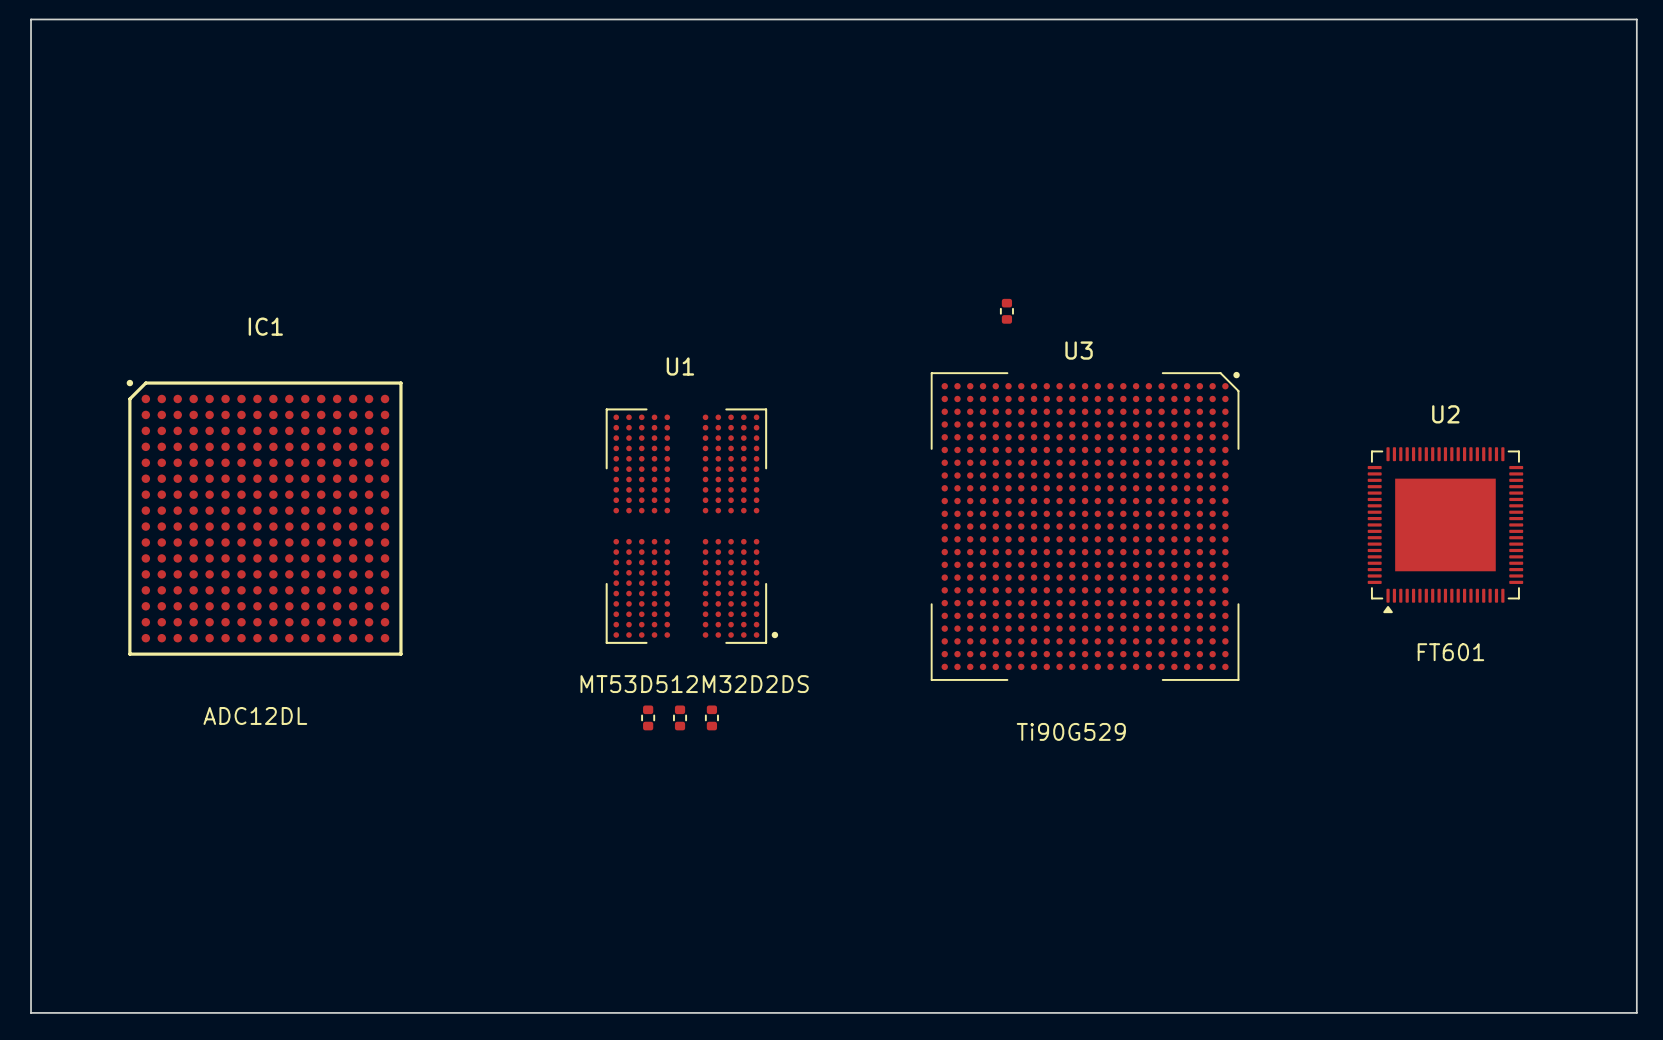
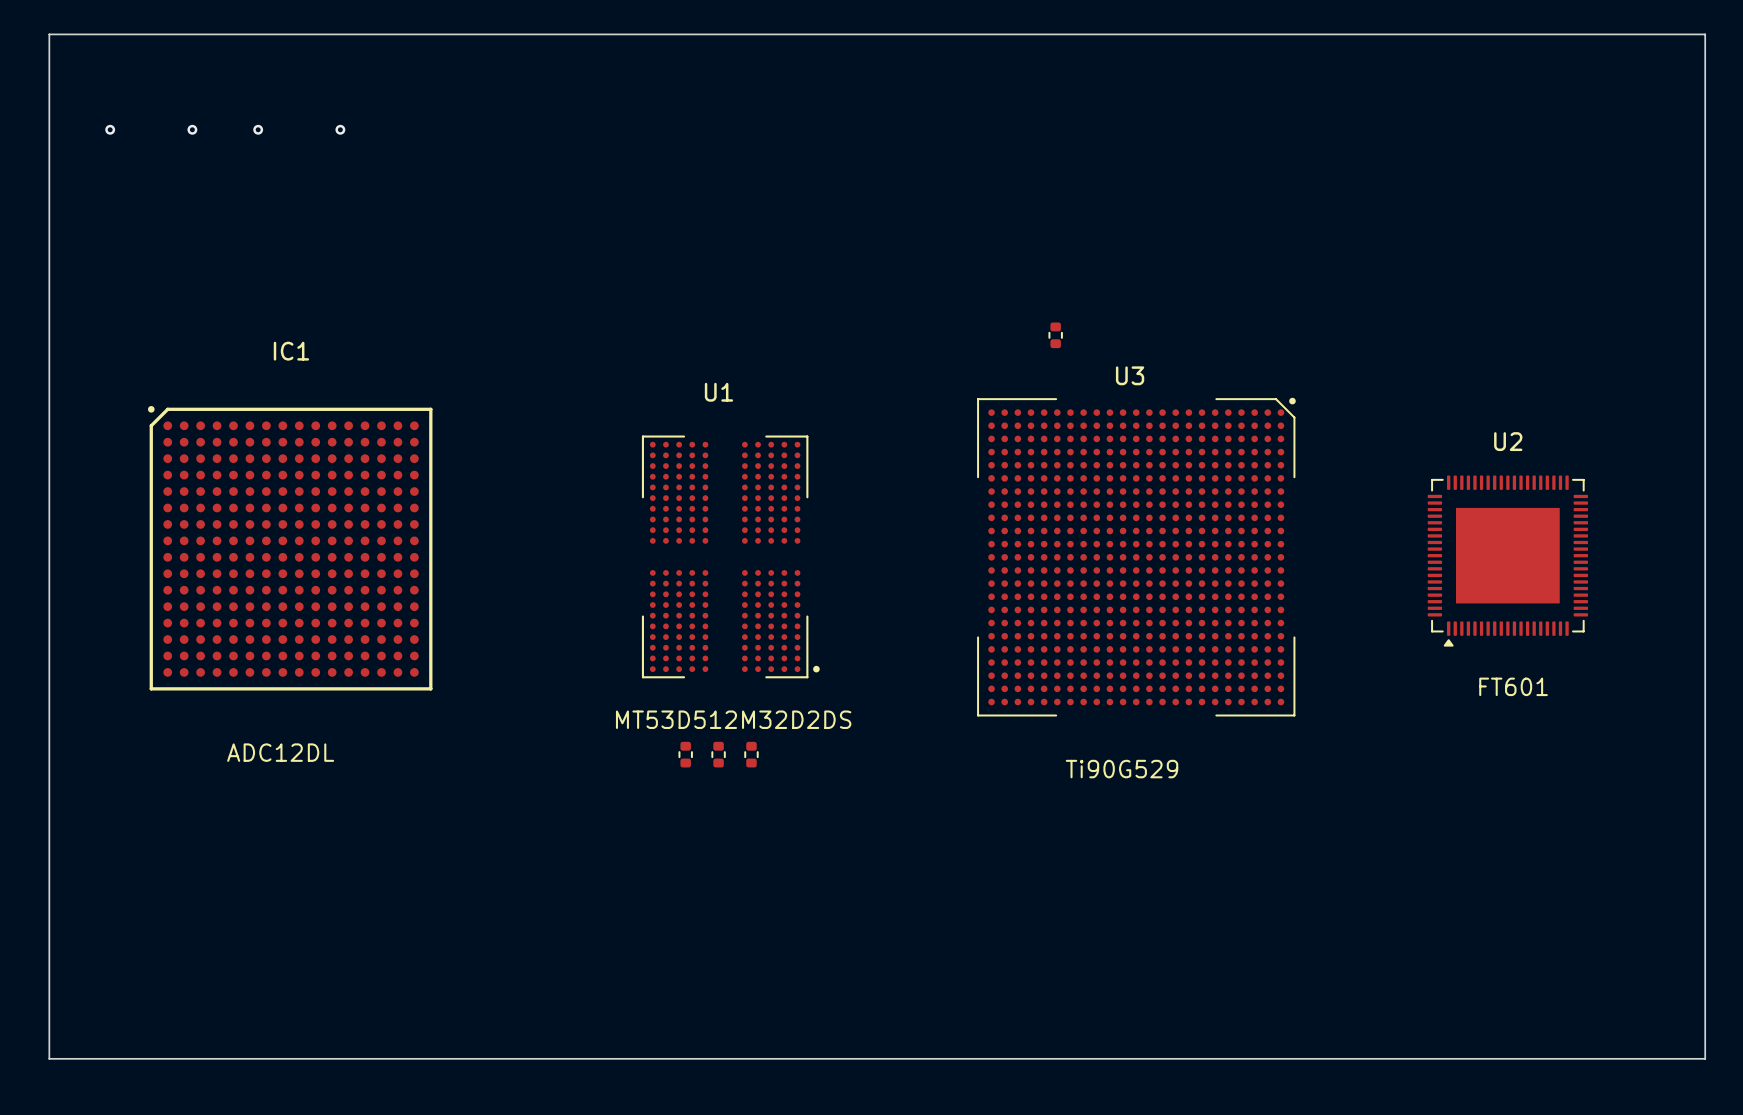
via: none -> (110, 129)
via: none -> (192, 129)
via: none -> (258, 129)
via: none -> (340, 129)

